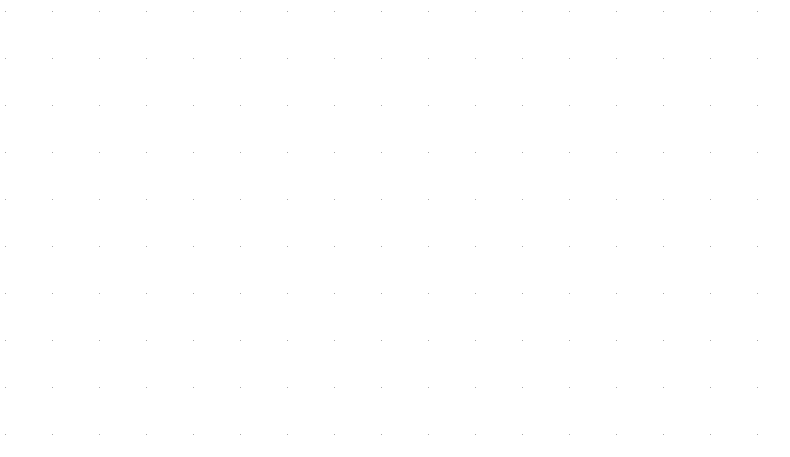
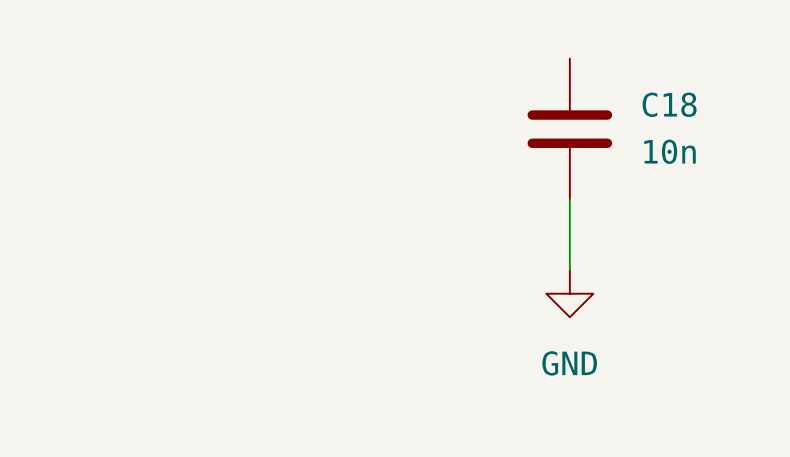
C18: none -> 10n (569, 129)
wire: none -> (569, 199) (569, 270)
power symbol: none -> GND (569, 293)

